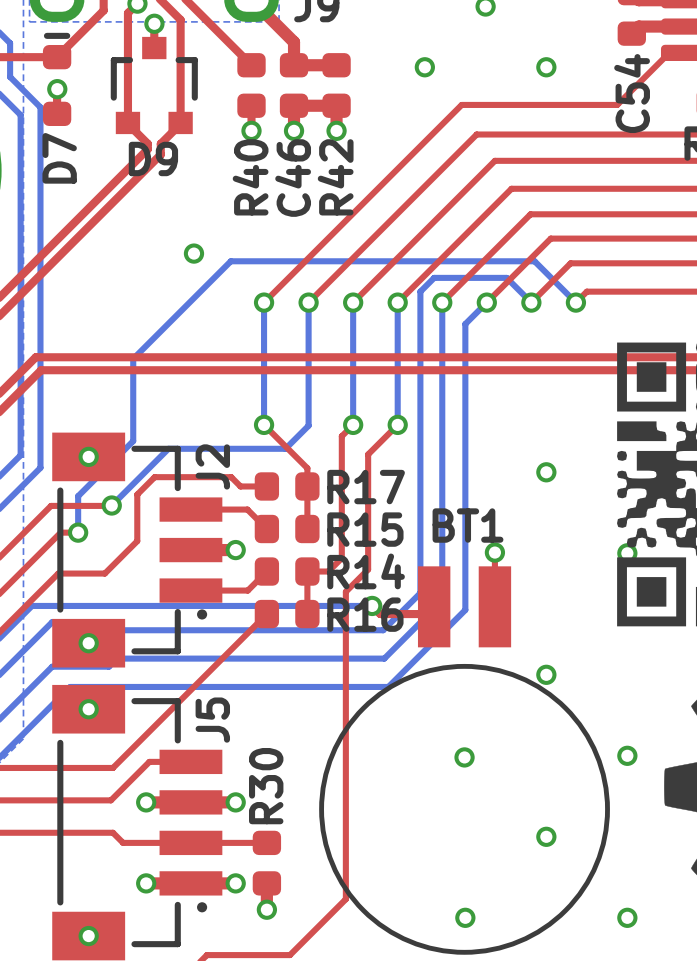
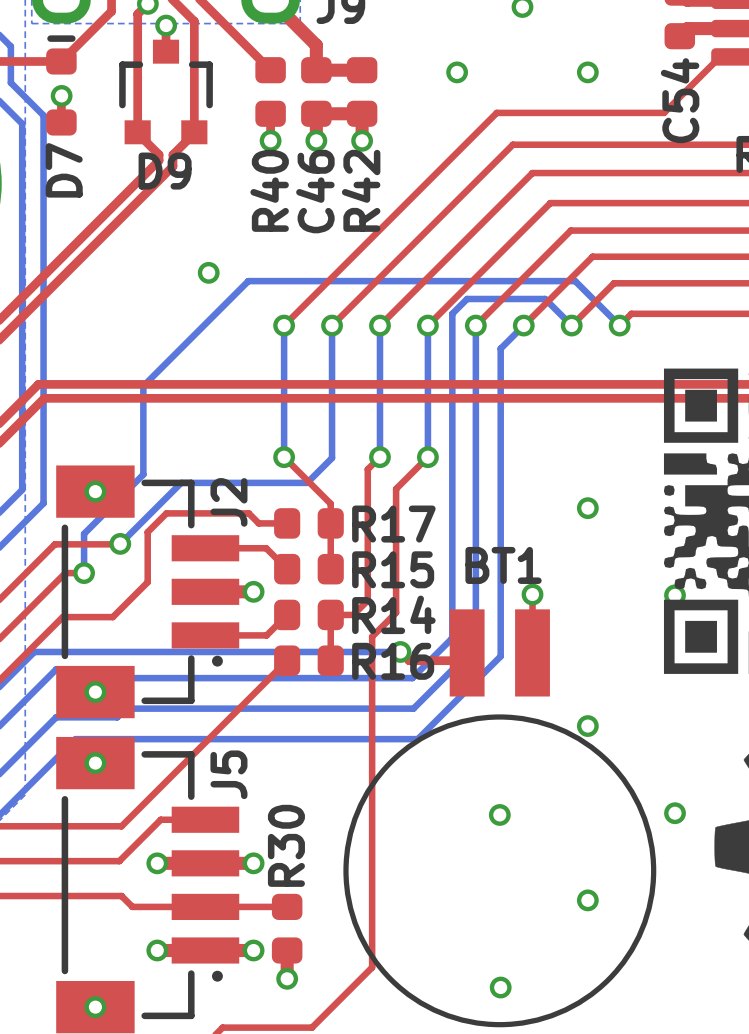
via: (627, 917) -> none

